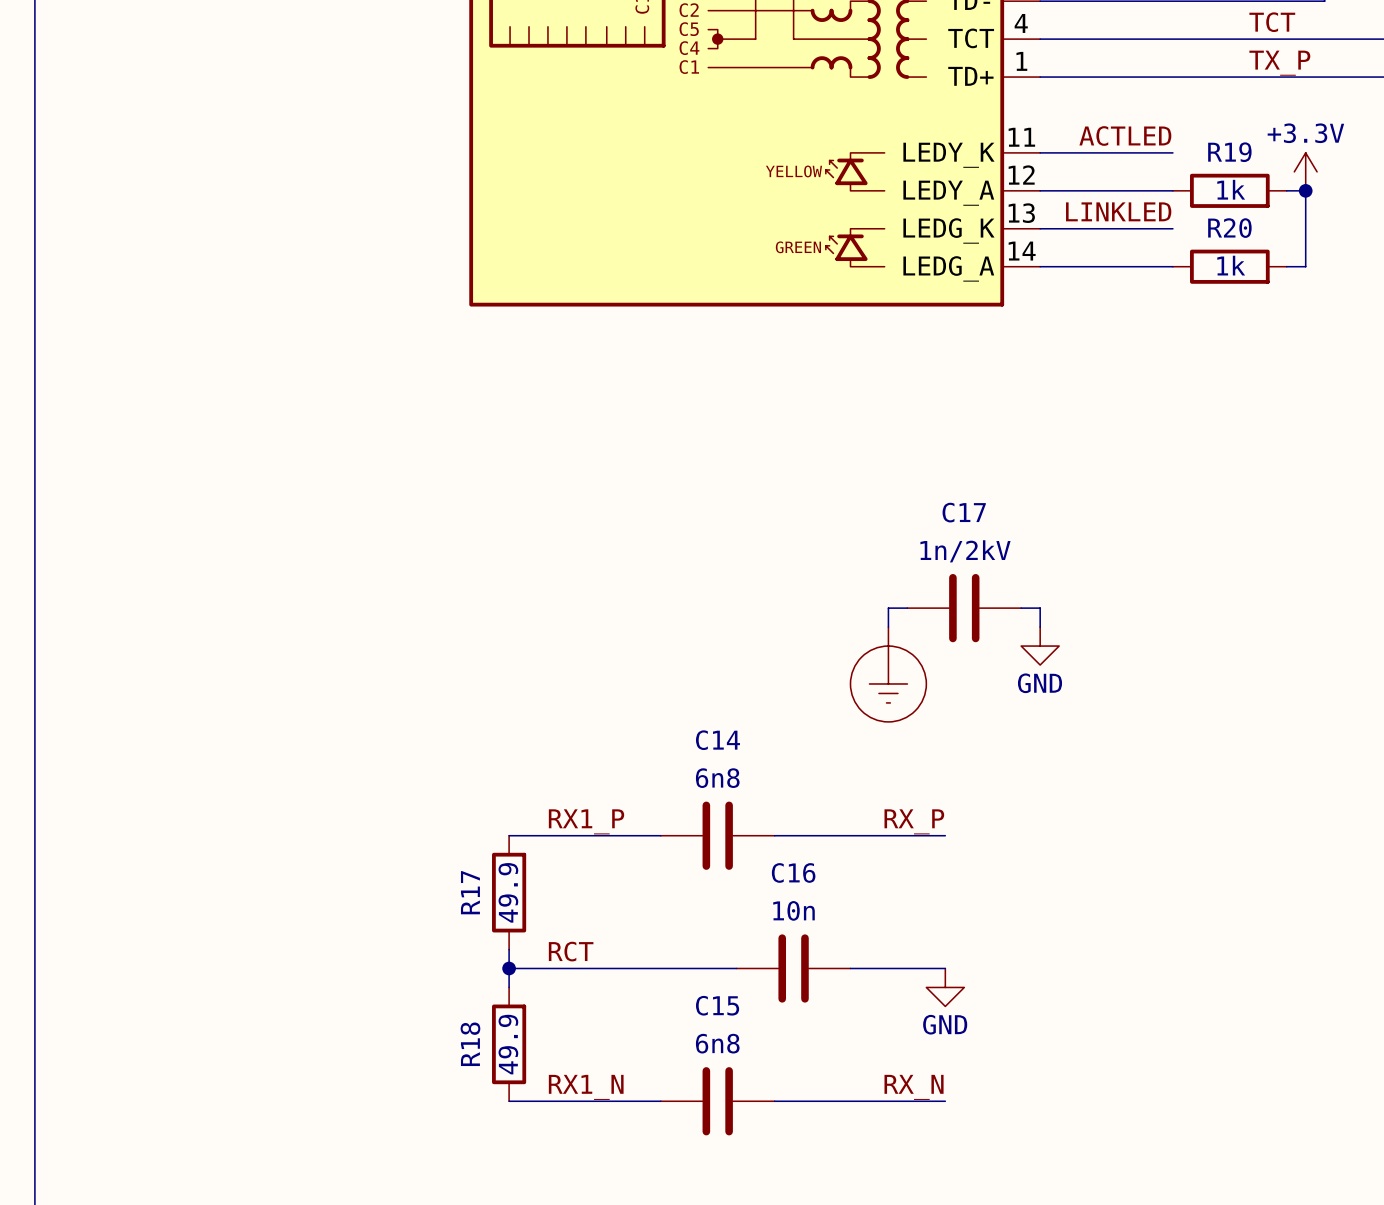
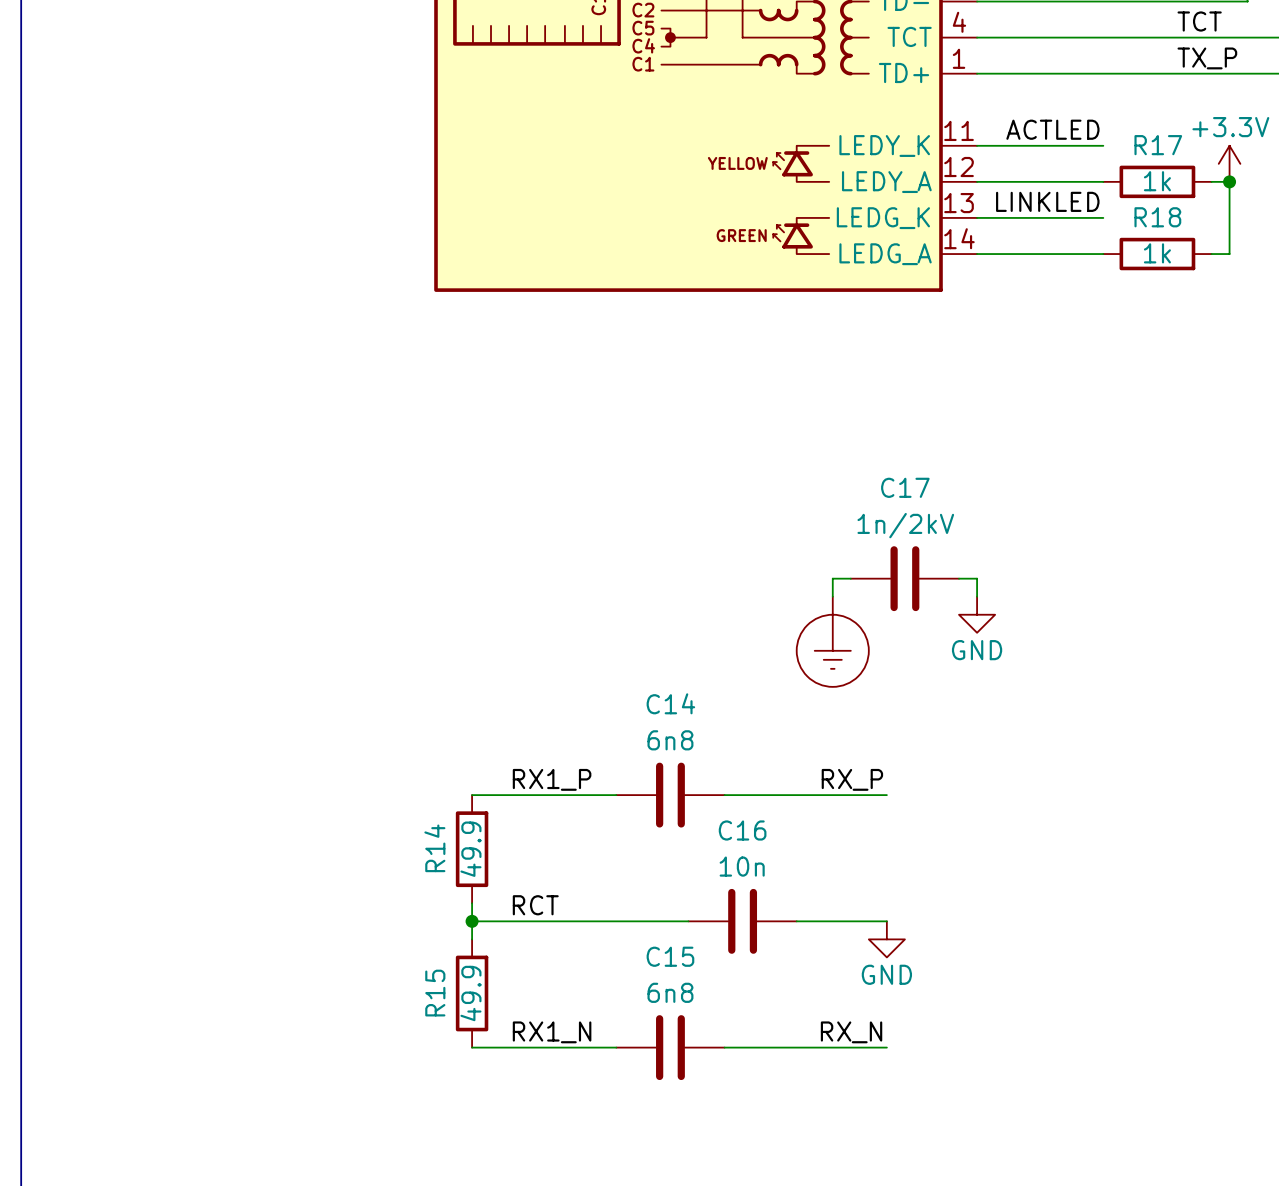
R19 name: R19 (1229, 152) -> R17 (1158, 145)
R20 name: R20 (1229, 228) -> R18 (1157, 217)
R17 name: R17 (470, 892) -> R14 (434, 848)
R18 name: R18 (470, 1044) -> R15 (435, 993)

